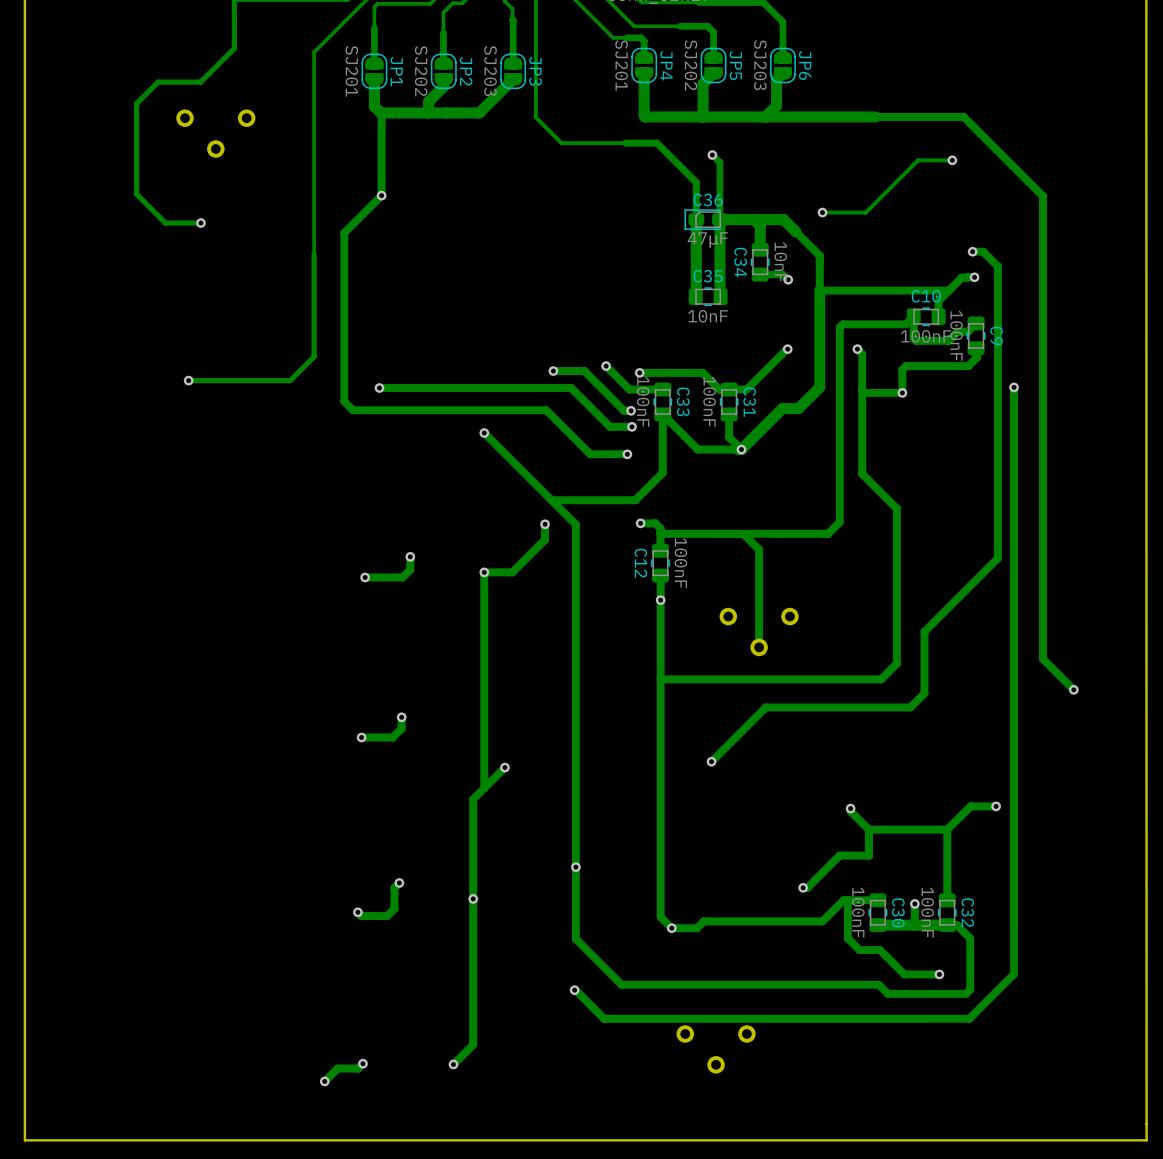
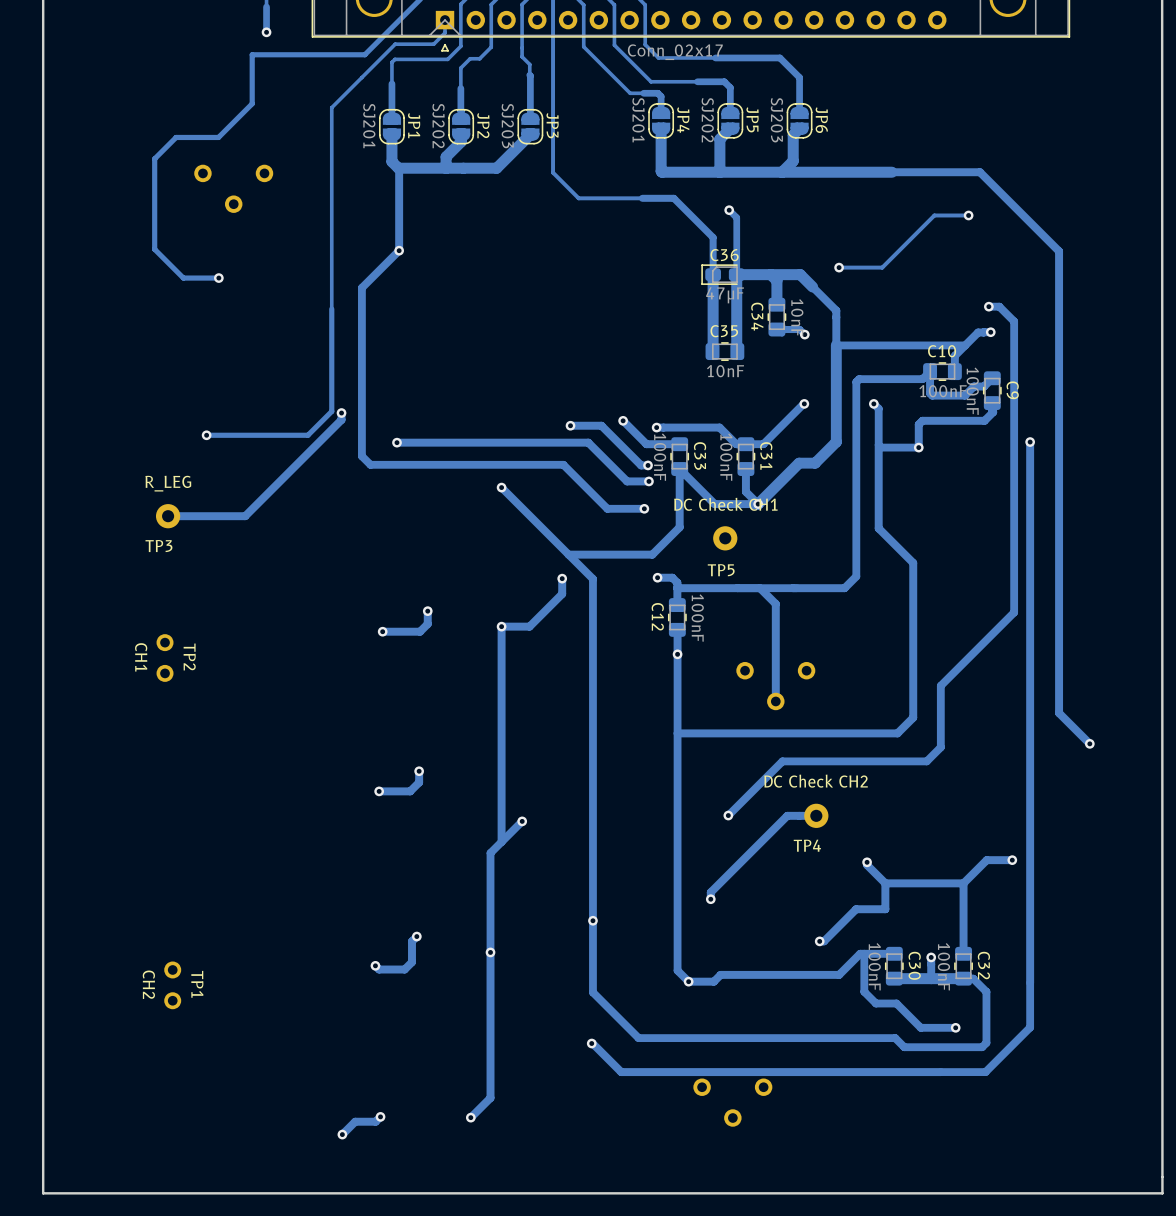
track: none -> (341, 413) (341, 419) (245, 516) (168, 516)
via: none -> (341, 413)
TP3: none -> R_LEG (168, 516)
TP5: none -> DC Check CH1 (725, 538)
TP2: none -> CH1 (165, 658)
track: none -> (816, 815) (787, 815) (710, 892) (710, 899)
TP4: none -> DC Check CH2 (816, 815)
via: none -> (710, 899)
TP1: none -> CH2 (172, 985)

